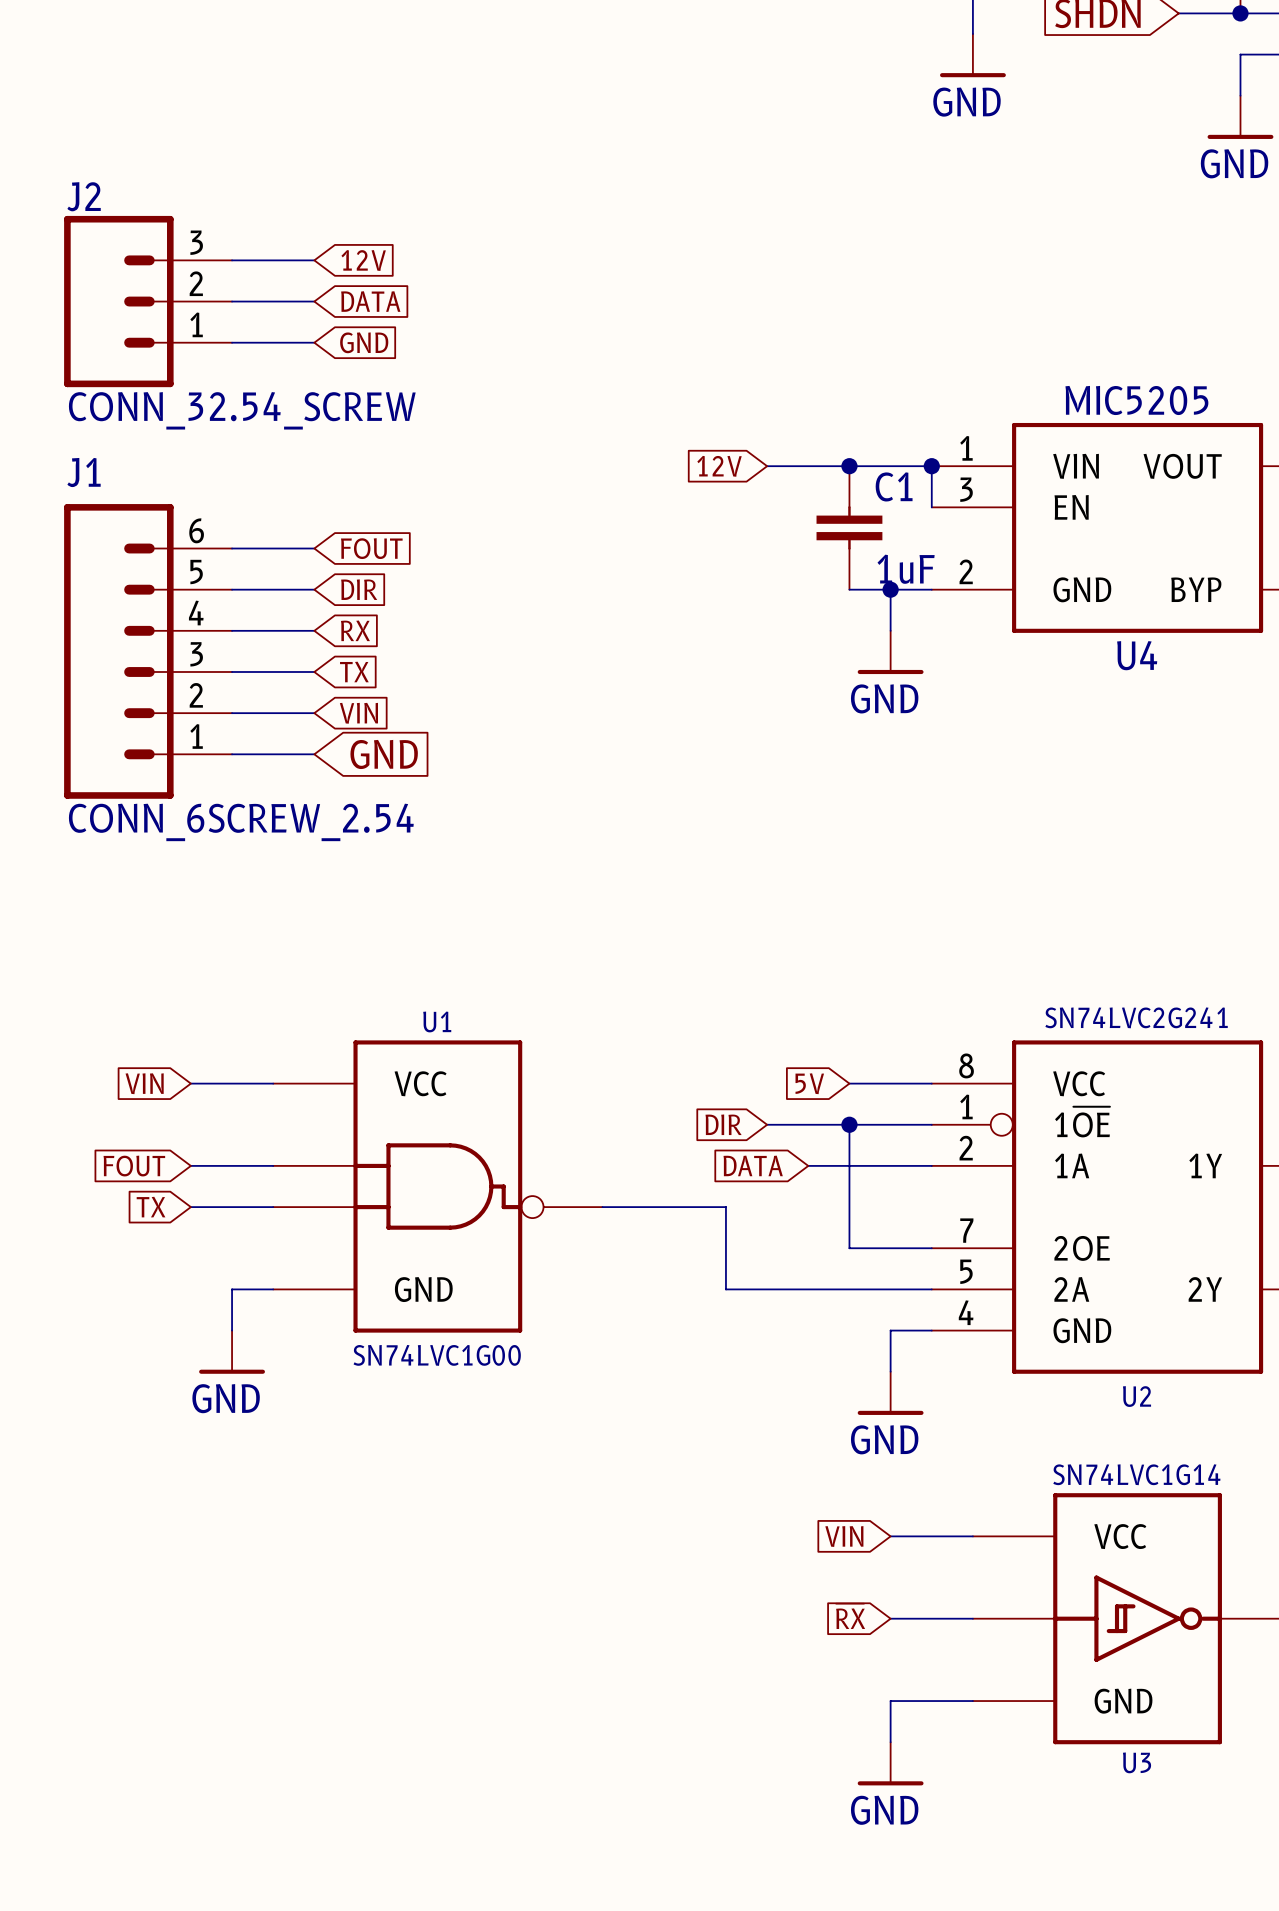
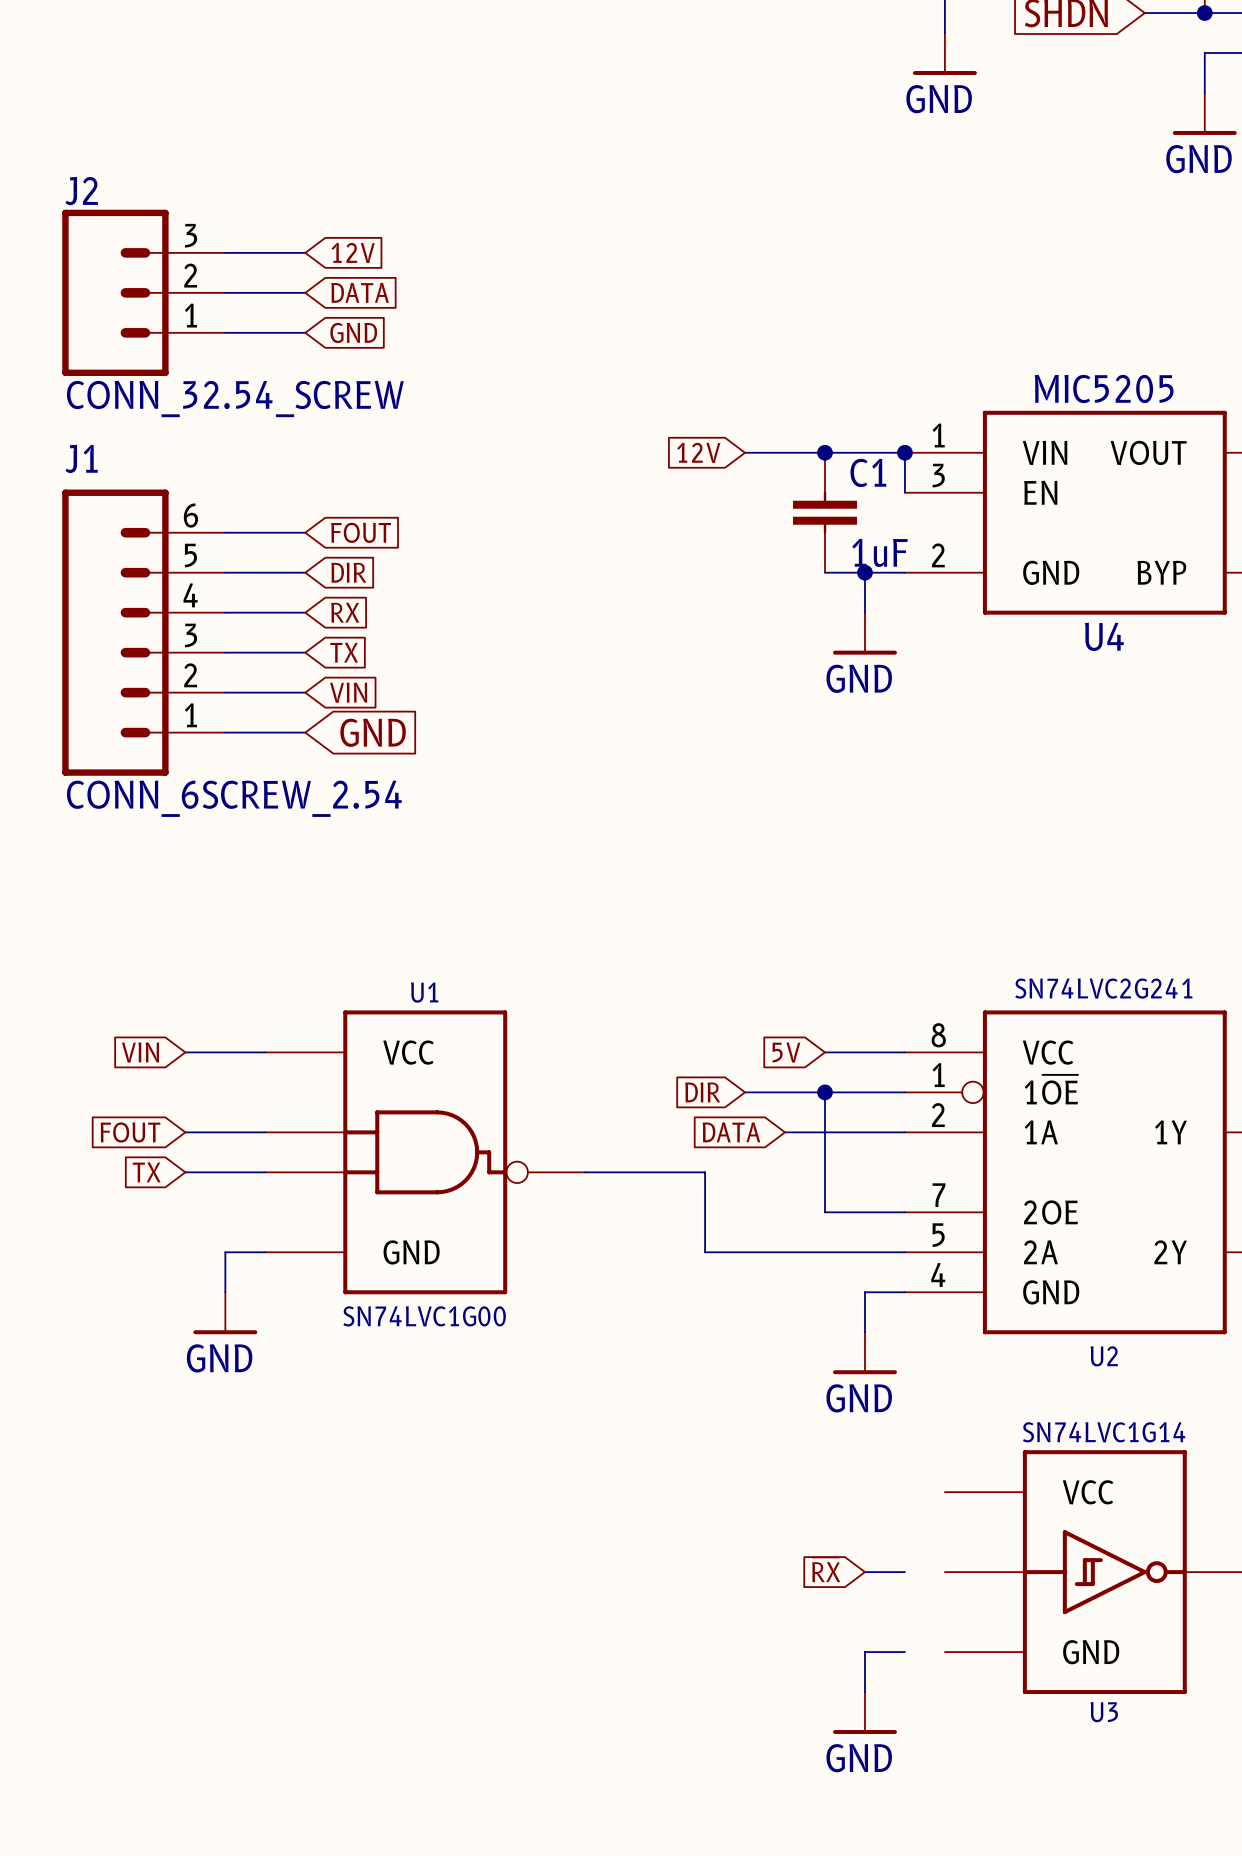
global label: VIN (844, 1536) -> none
wire: (890, 1536) (972, 1536) -> none
wire: (931, 1618) (972, 1618) -> none
wire: (931, 1701) (972, 1701) -> none

